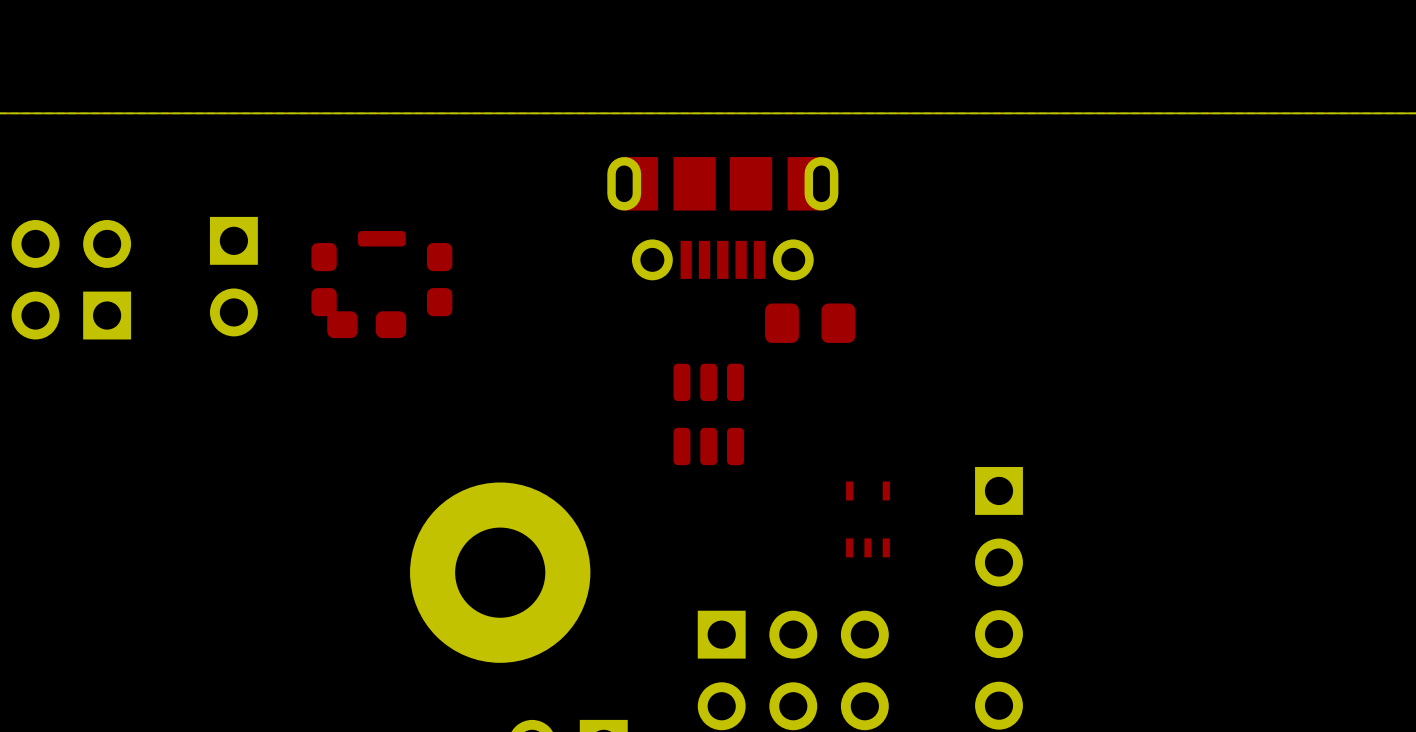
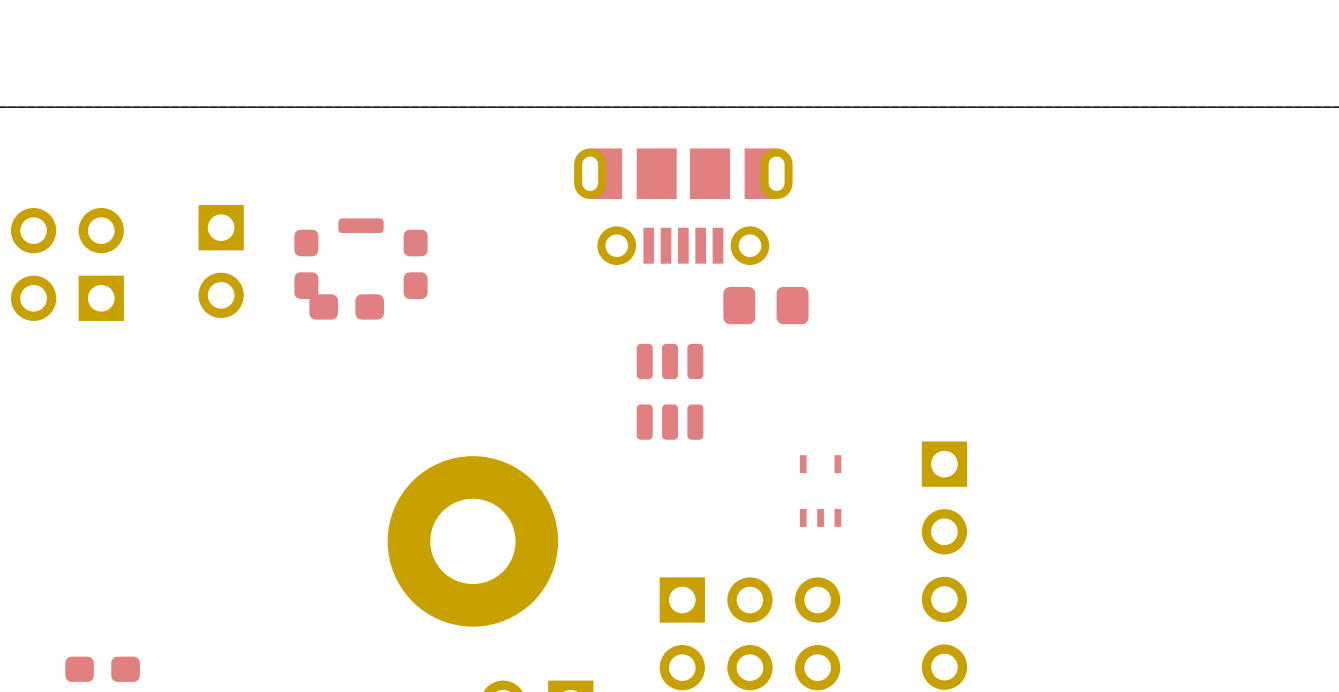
part: none -> (102, 669)

